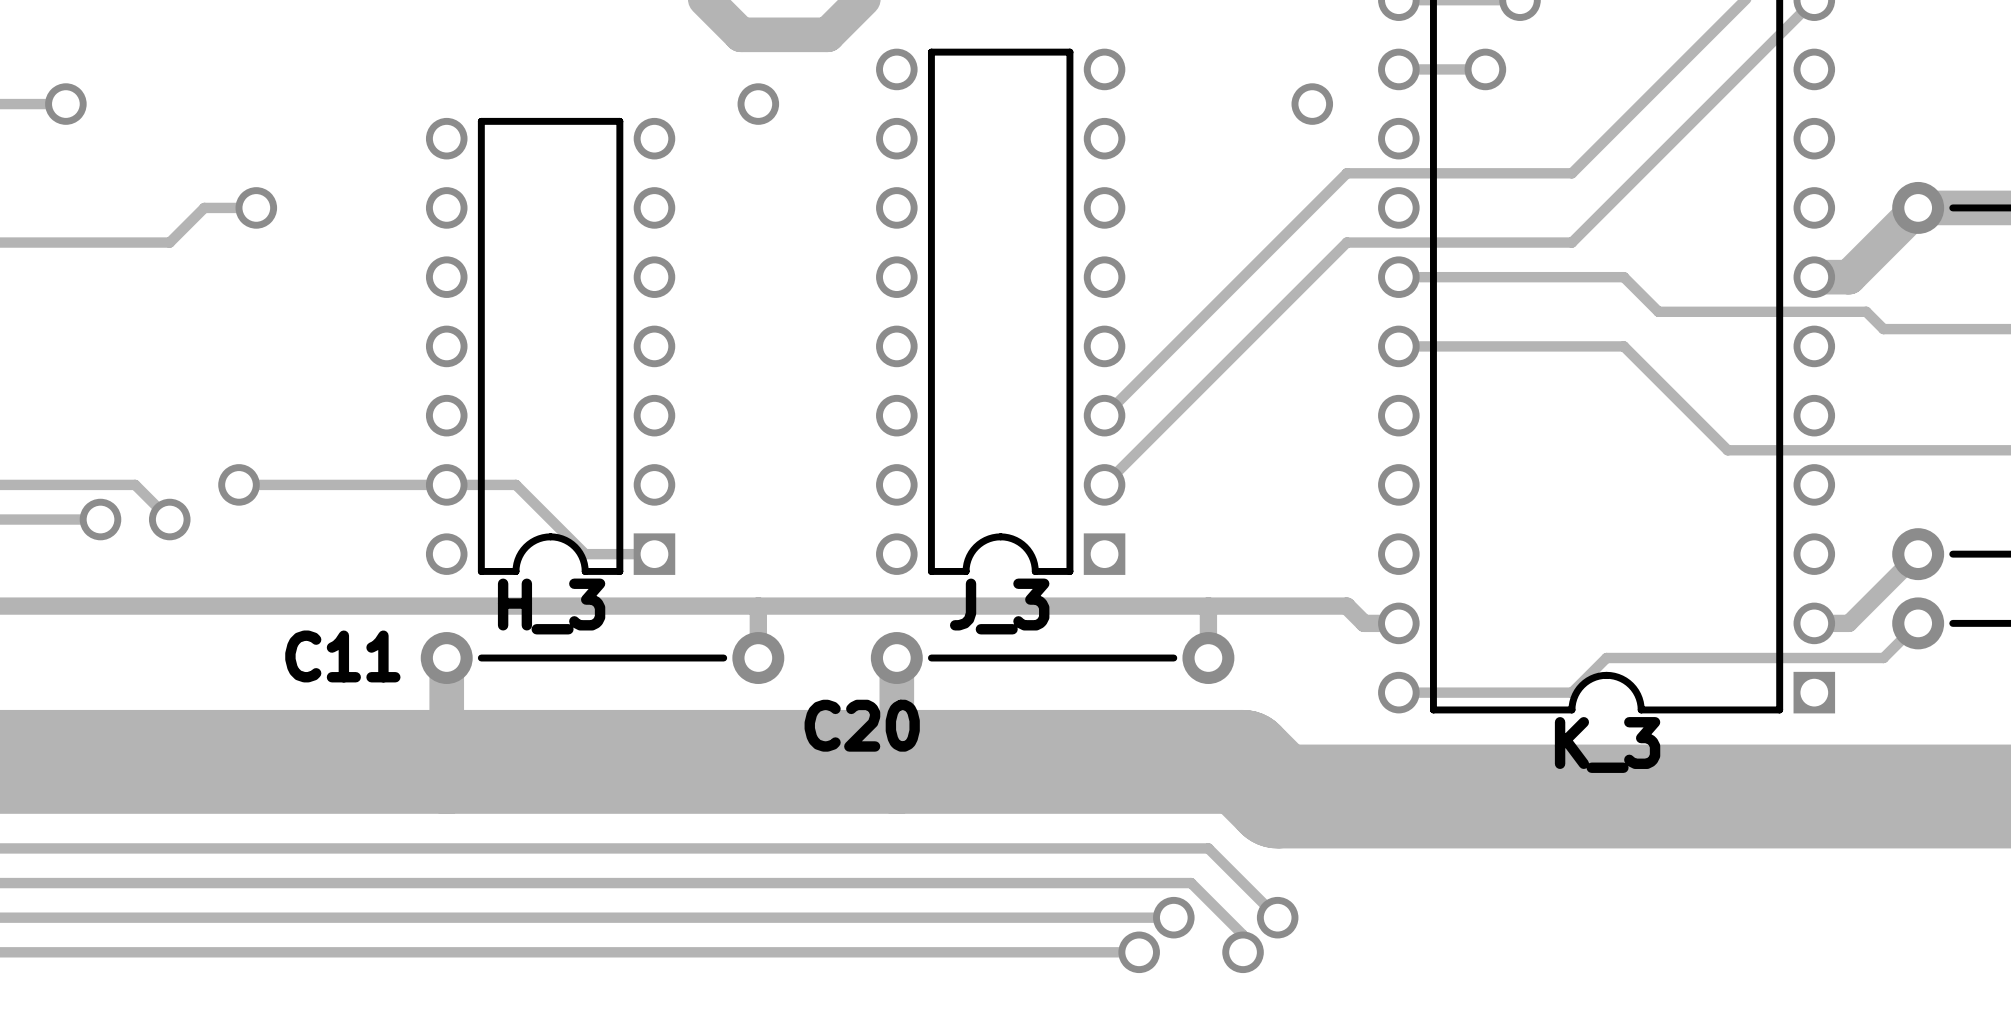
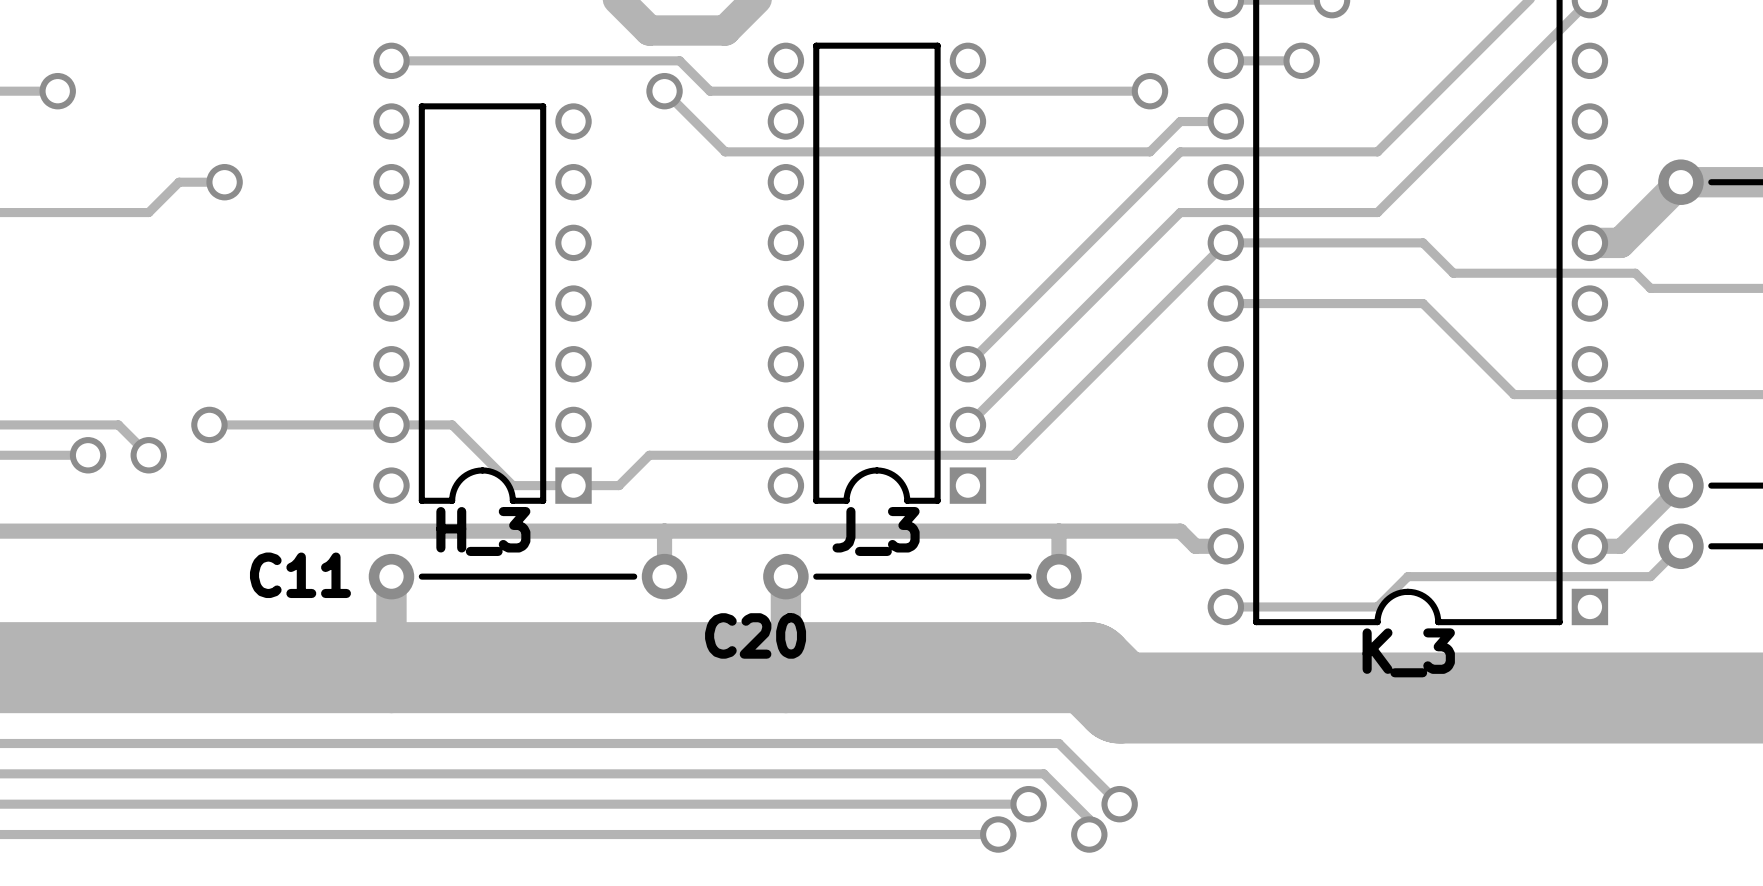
track: none -> (391, 60) (679, 60) (710, 91) (1149, 91)
via: none -> (391, 60)
track: none -> (664, 91) (725, 151) (1149, 151) (1180, 121) (1225, 121)
track: none -> (1225, 242) (1013, 455) (649, 455) (619, 485) (573, 485)

